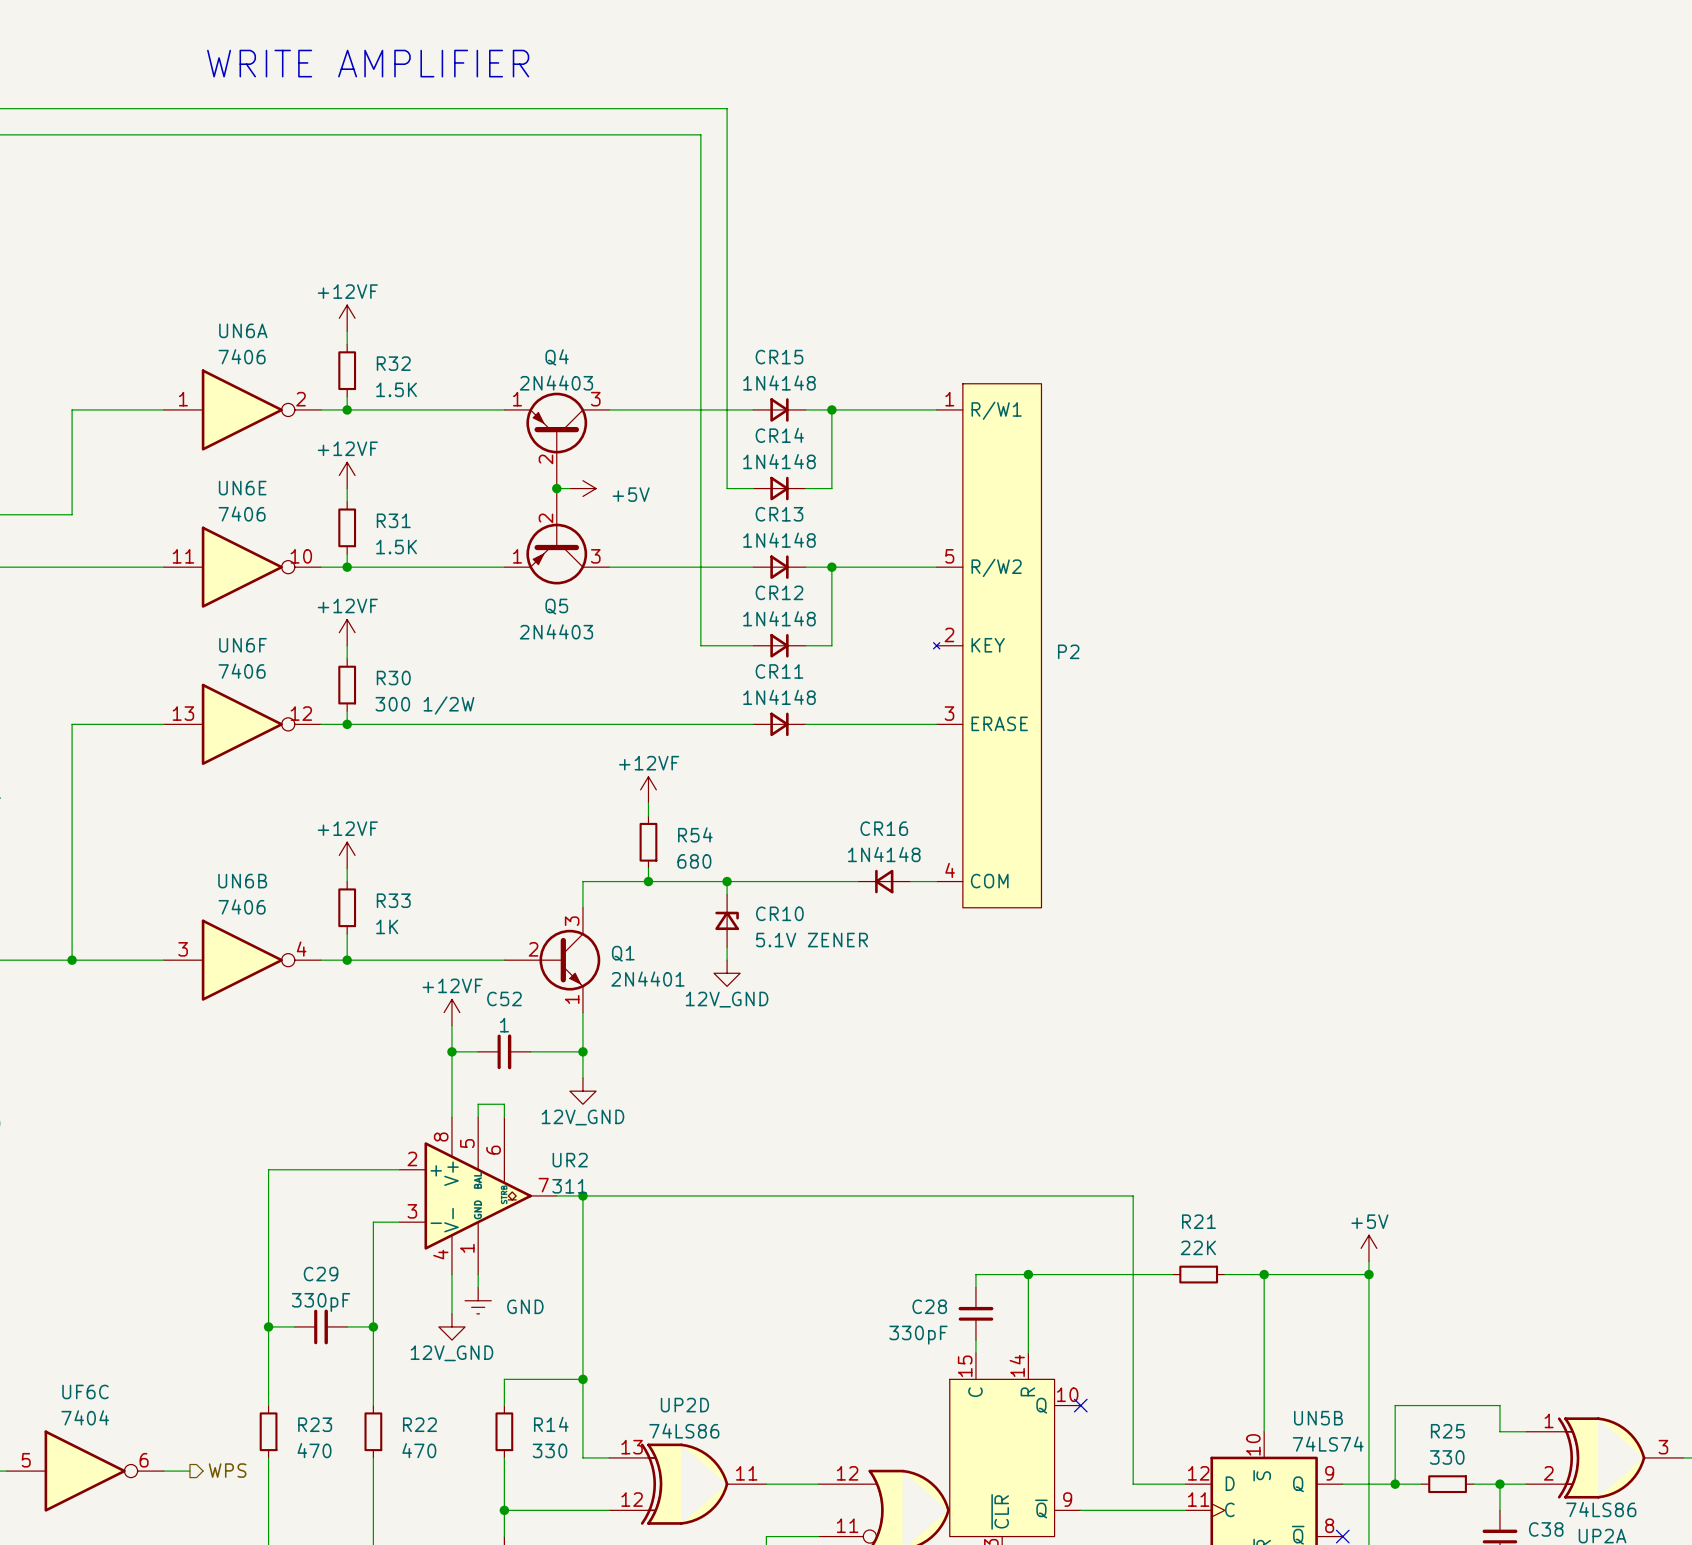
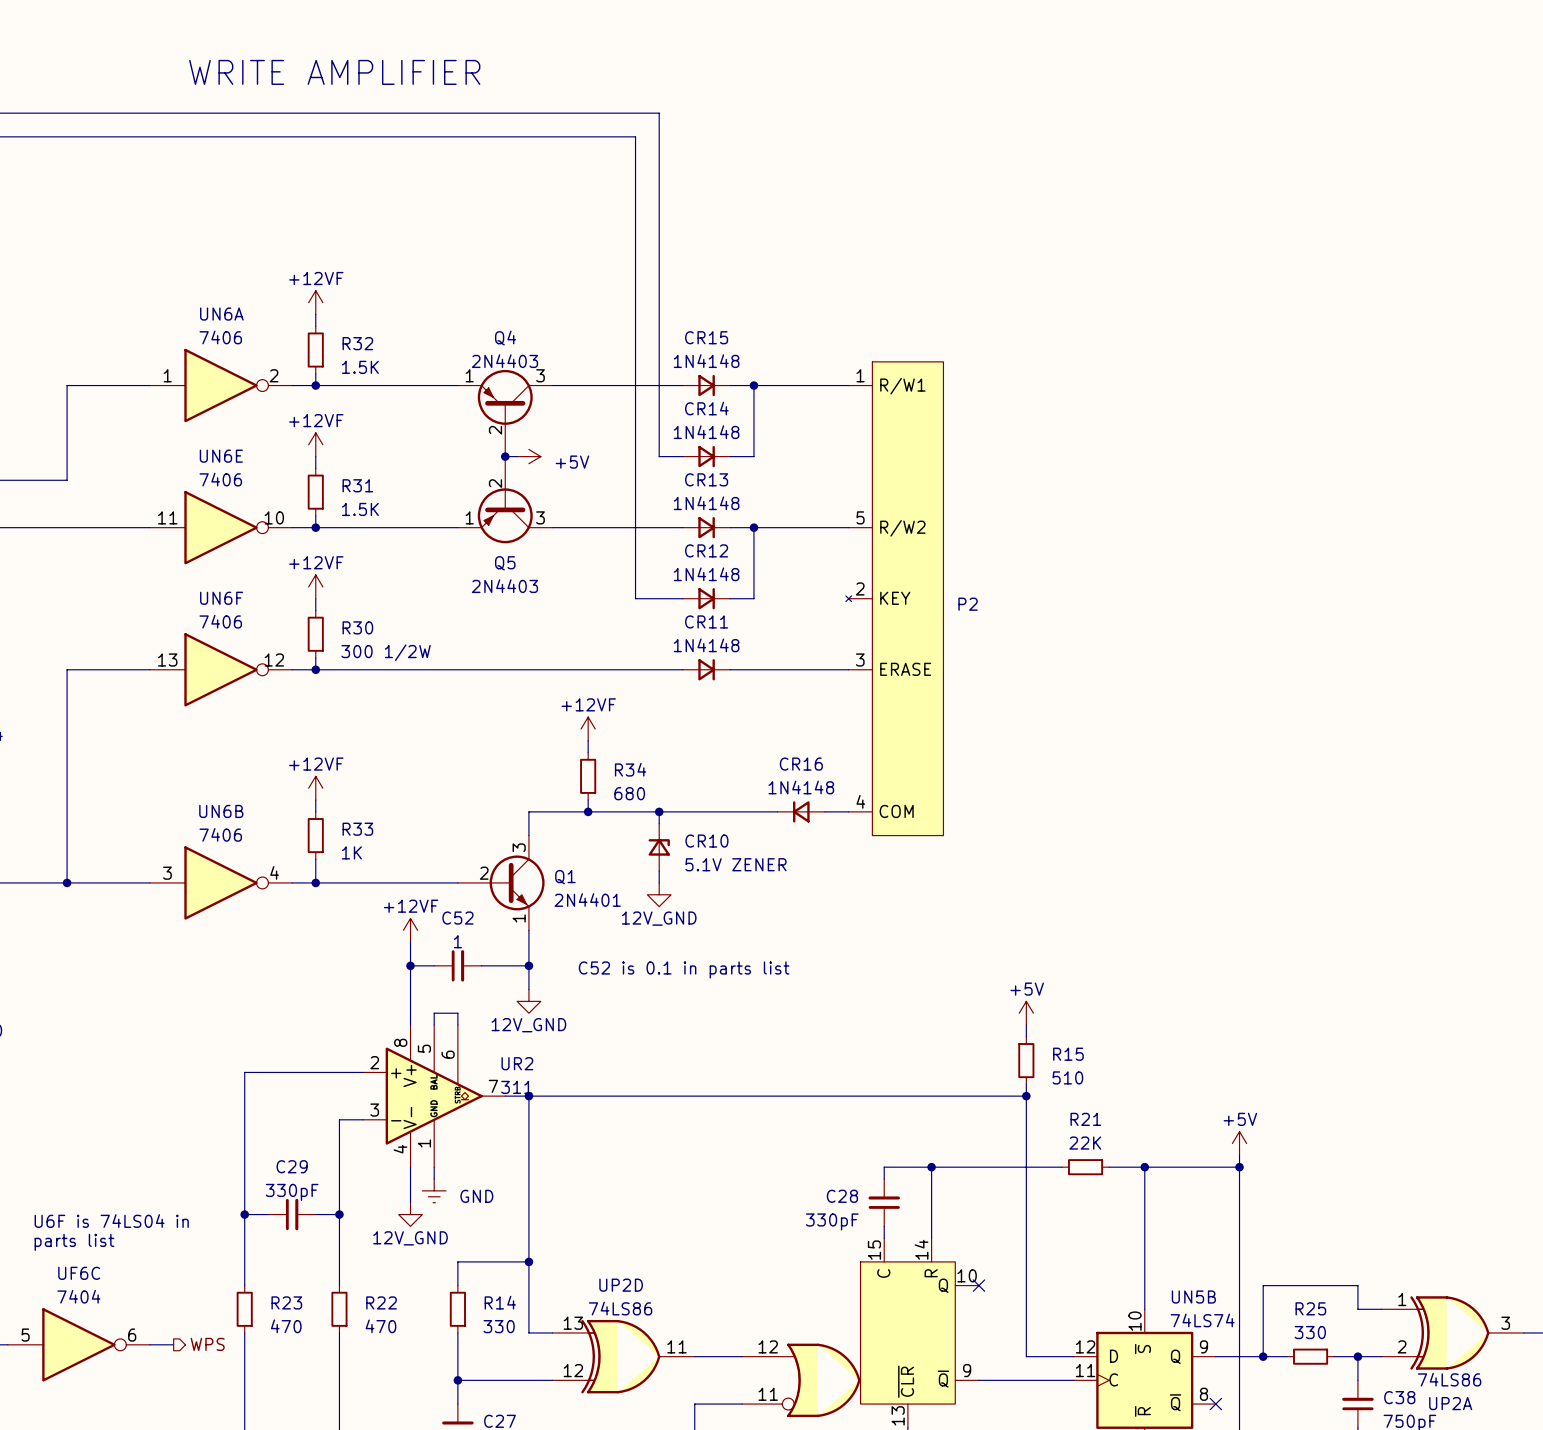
R54 name: R54 (695, 834) -> R34 (630, 769)
text: none -> C52 is 0.1 in parts list (684, 969)
power symbol: none -> +5V (1026, 1013)
wire: none -> (1026, 1025) (1026, 1036)
R15: none -> 510 (1026, 1060)
wire: none -> (1026, 1084) (1026, 1096)
junction: none -> (1026, 1096)
text: none -> U6F is 74LS04 in (111, 1221)
text: none -> parts list (74, 1242)

